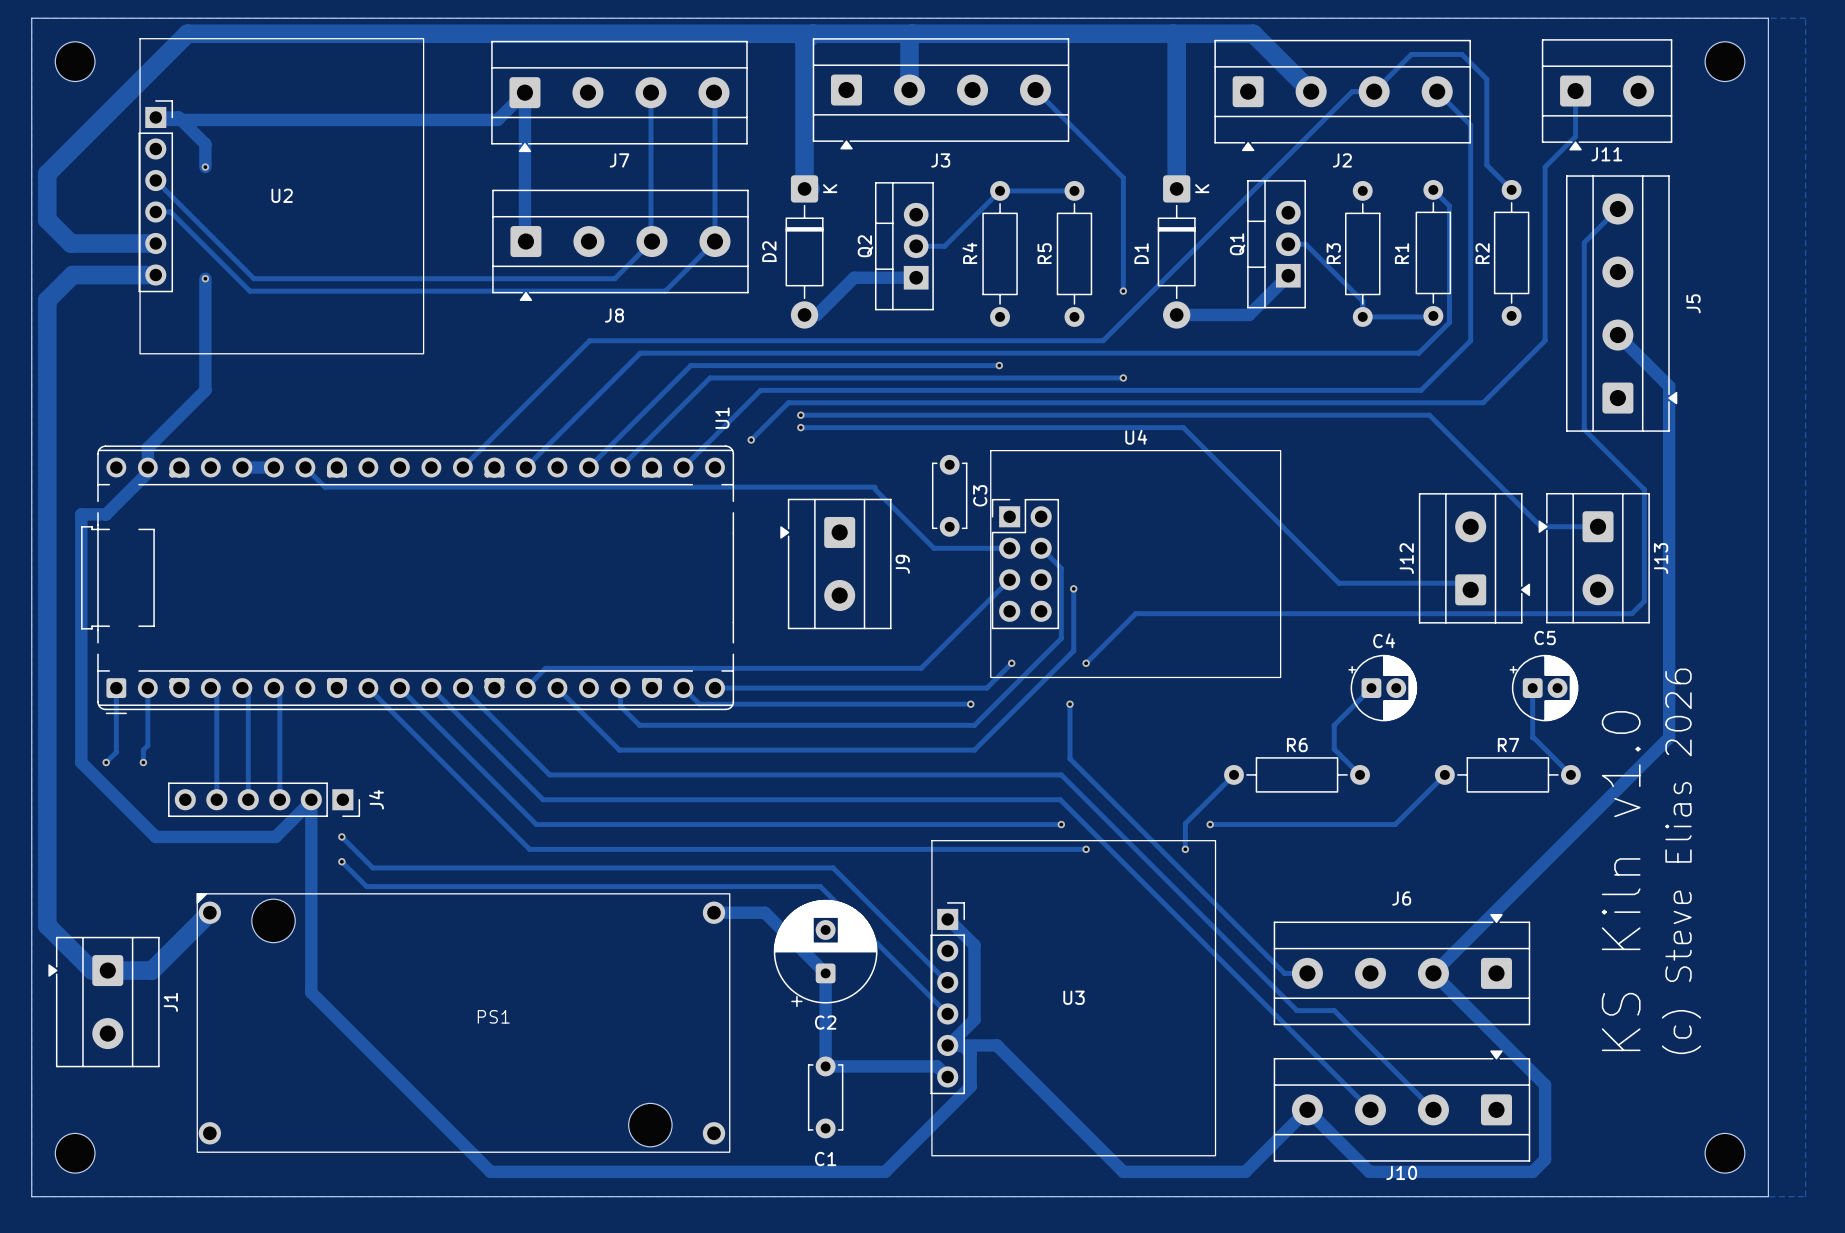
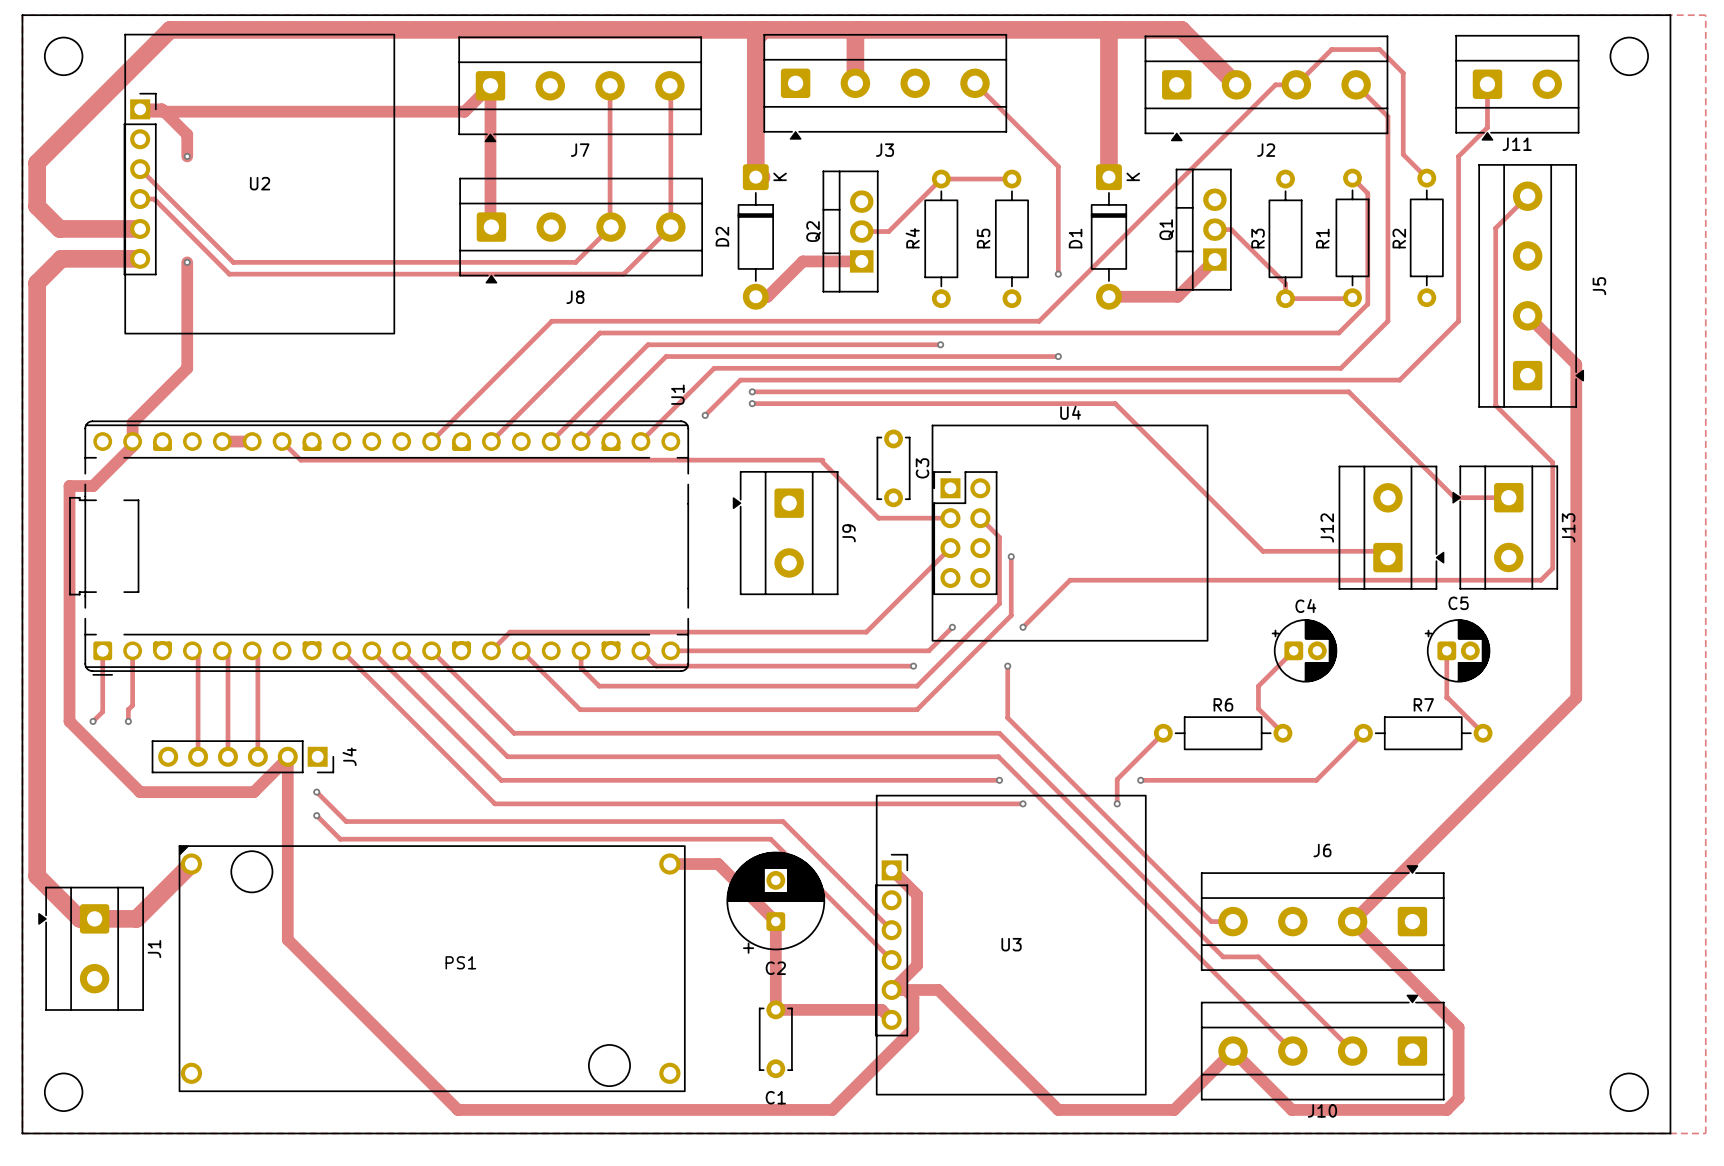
text: (c) Steve Elias 2026 (1681, 861) -> none
text: KS Kiln v1.0 (1621, 881) -> none

